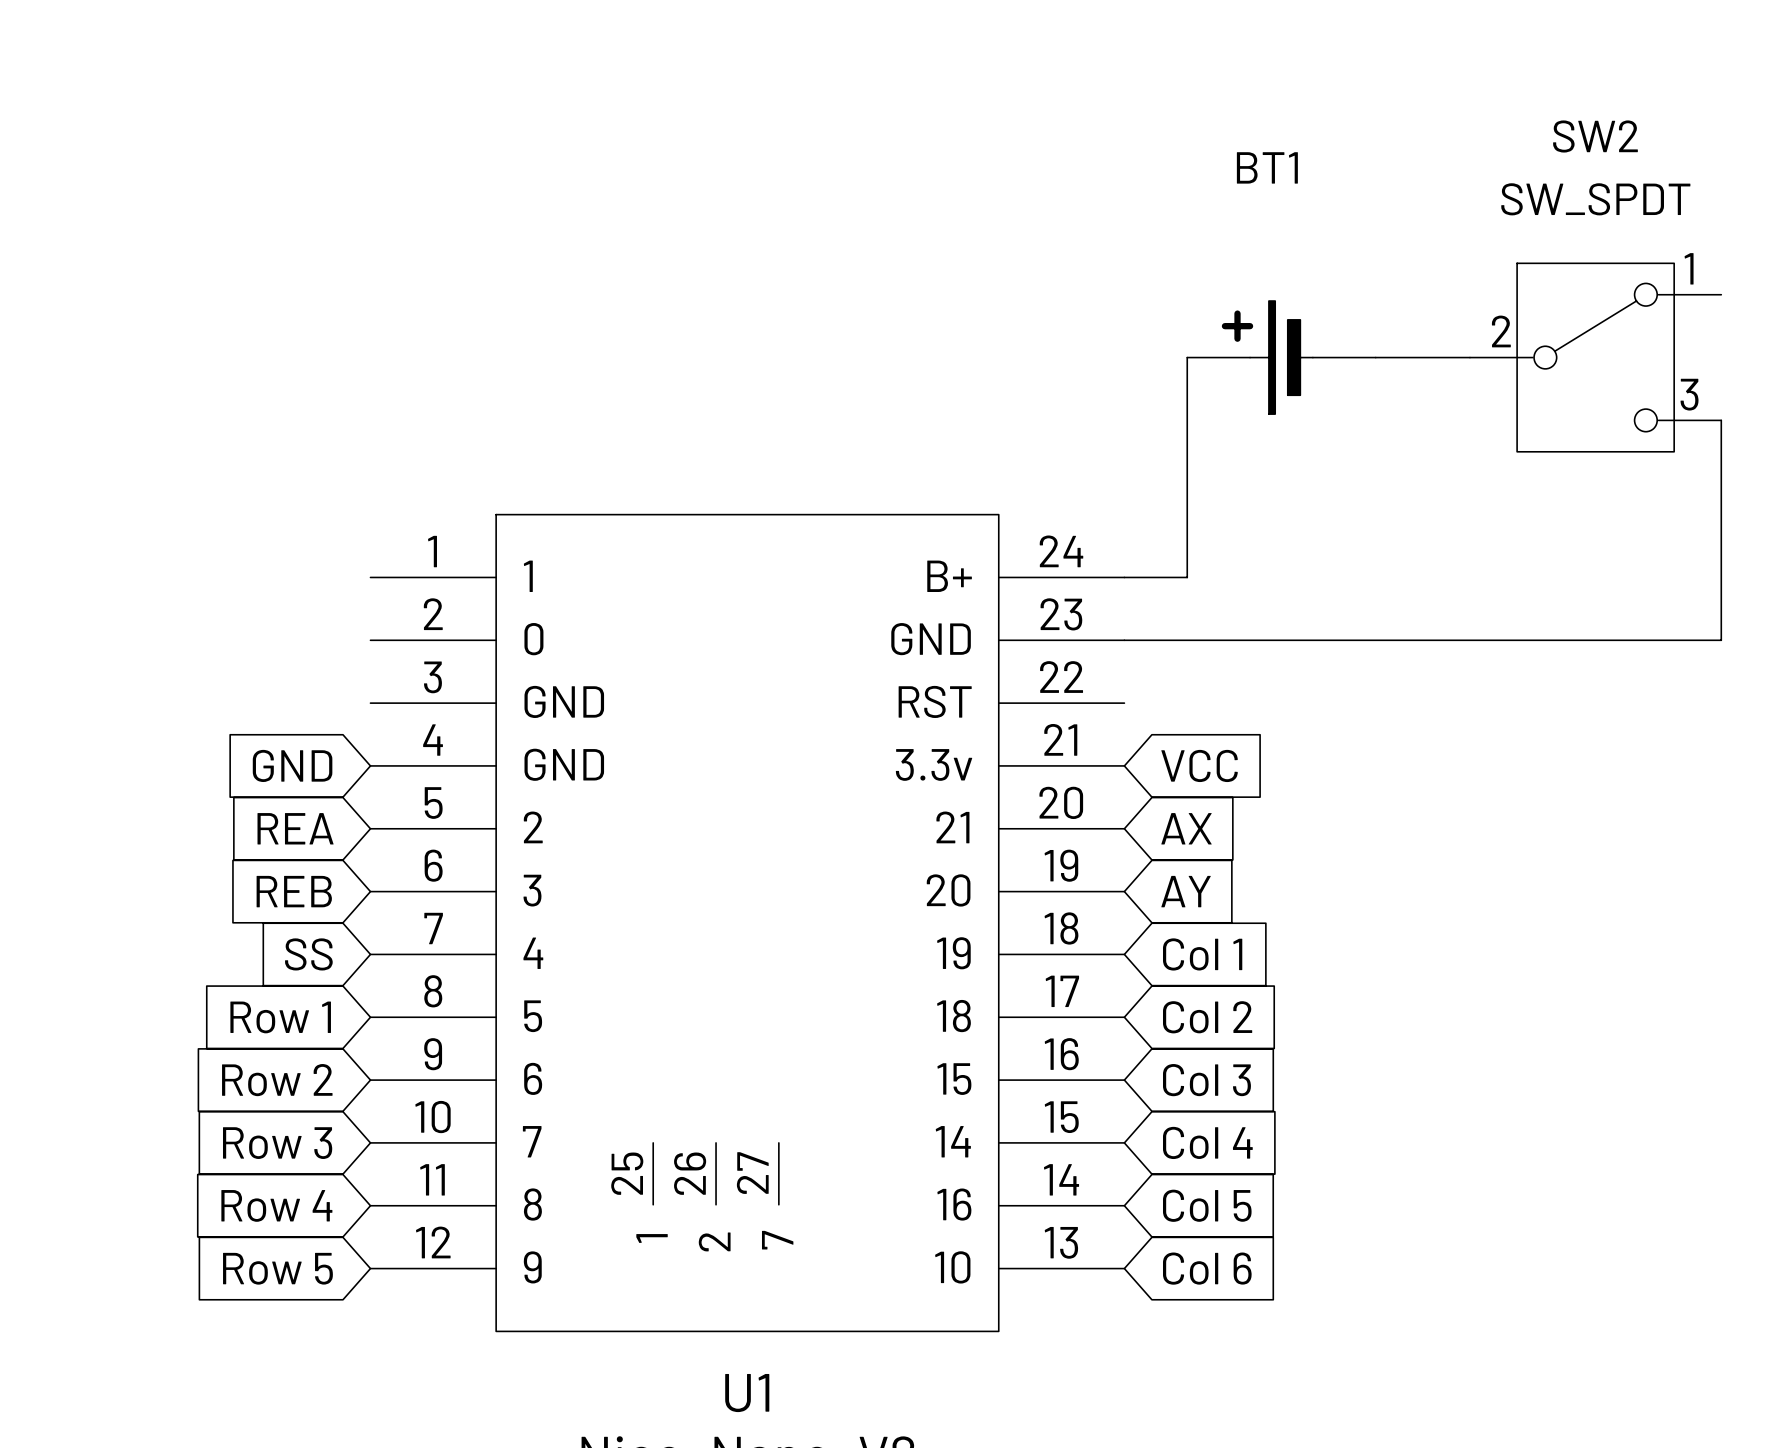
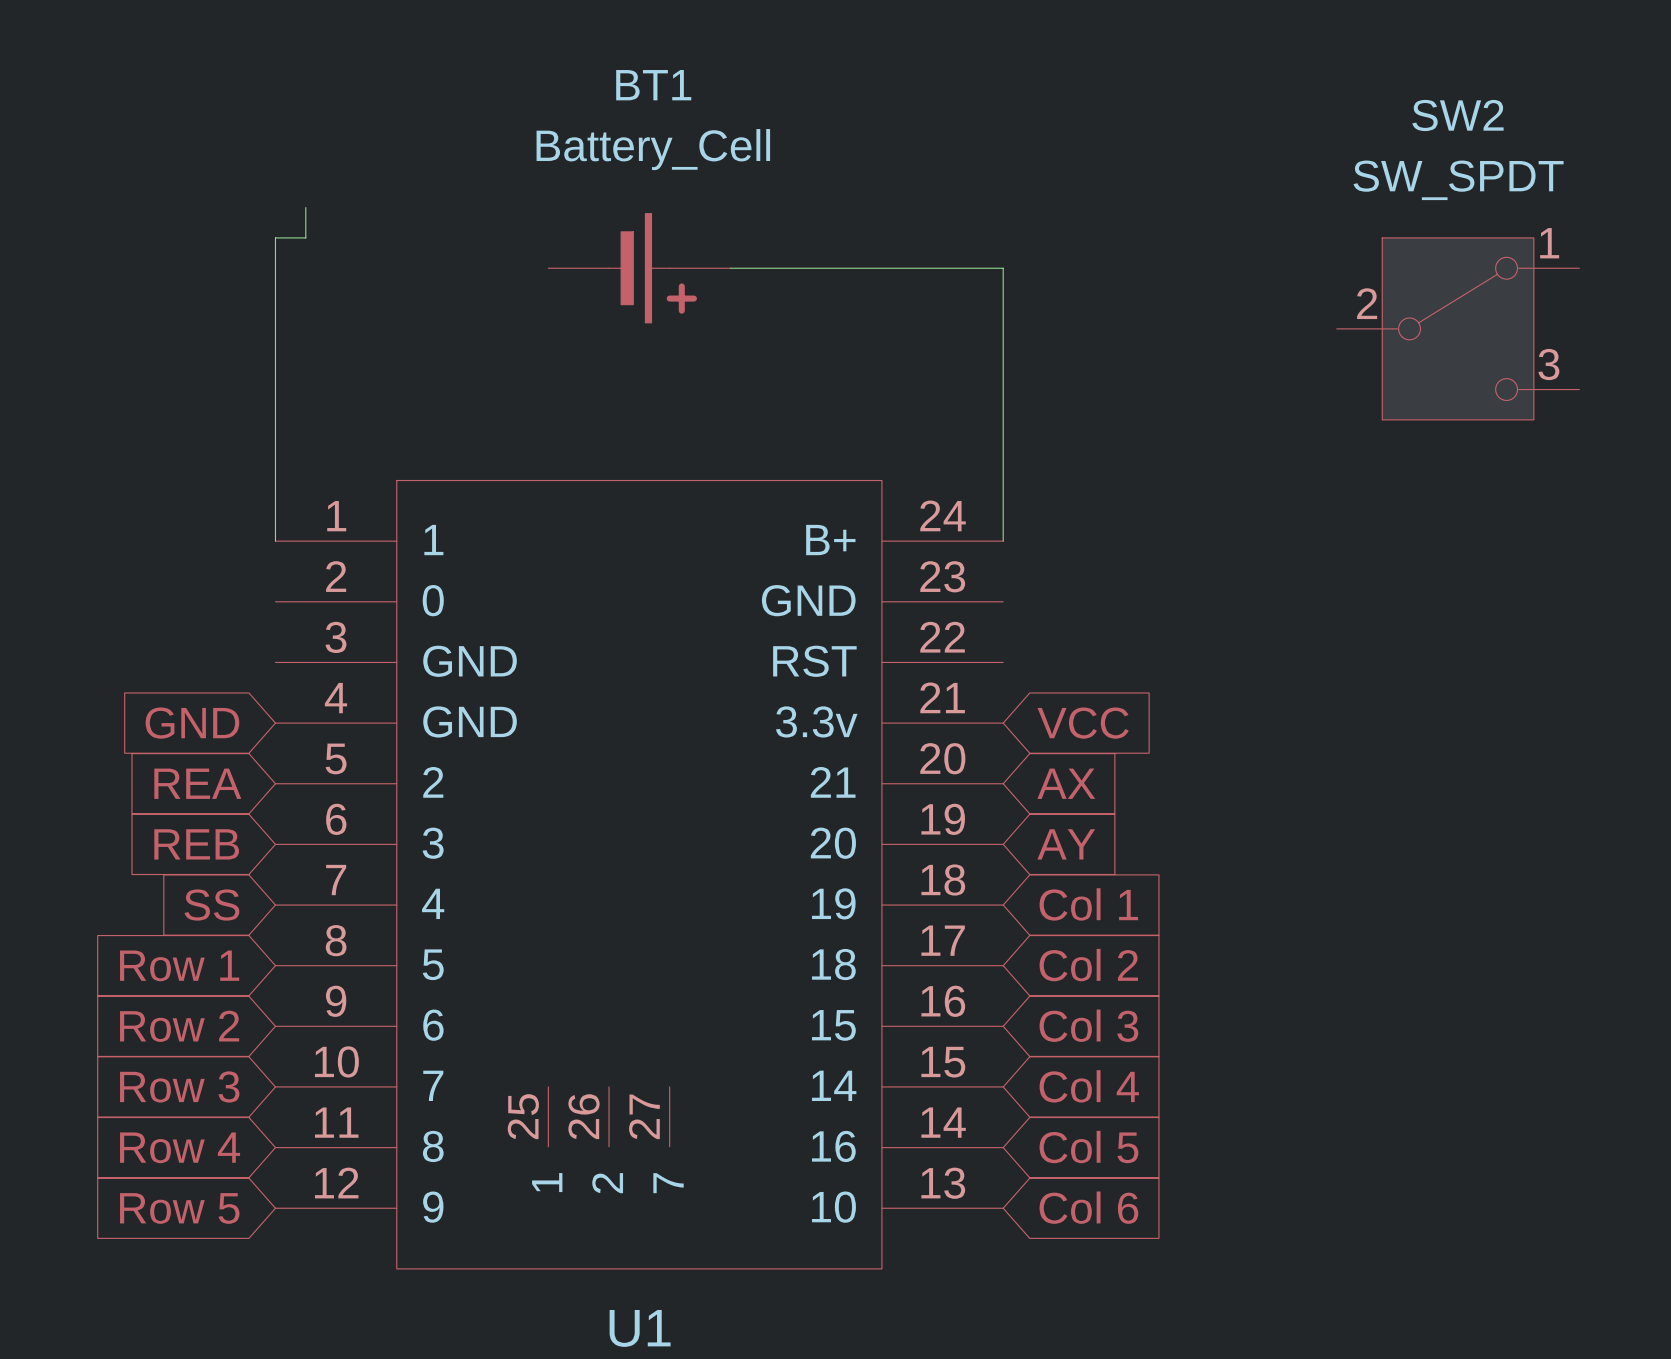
BT1 value: none -> Battery_Cell (653, 149)
wire: none -> (305, 207) (305, 237) (275, 237) (275, 541)
wire: (1187, 357) (1187, 577) (1124, 577) -> (730, 268) (1003, 268) (1003, 541)
BT1 rotation: 0° (1267, 357) -> 180° (652, 268)
BT1 position: (1281, 357) -> (639, 268)
wire: (1375, 357) (1469, 357) -> none
wire: (1721, 420) (1721, 640) (1124, 640) -> none

